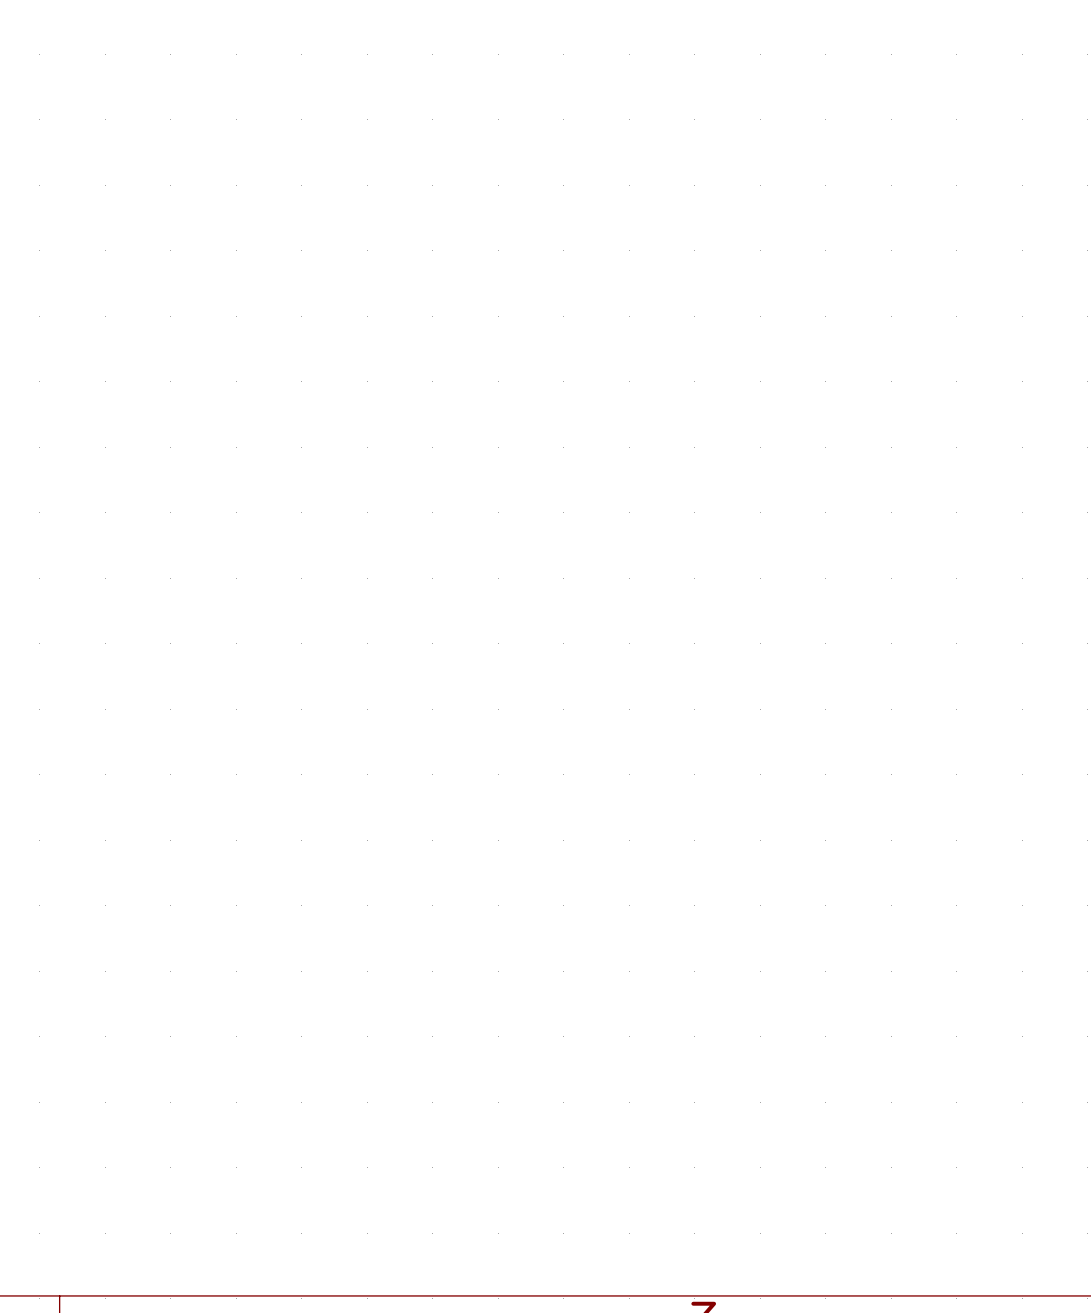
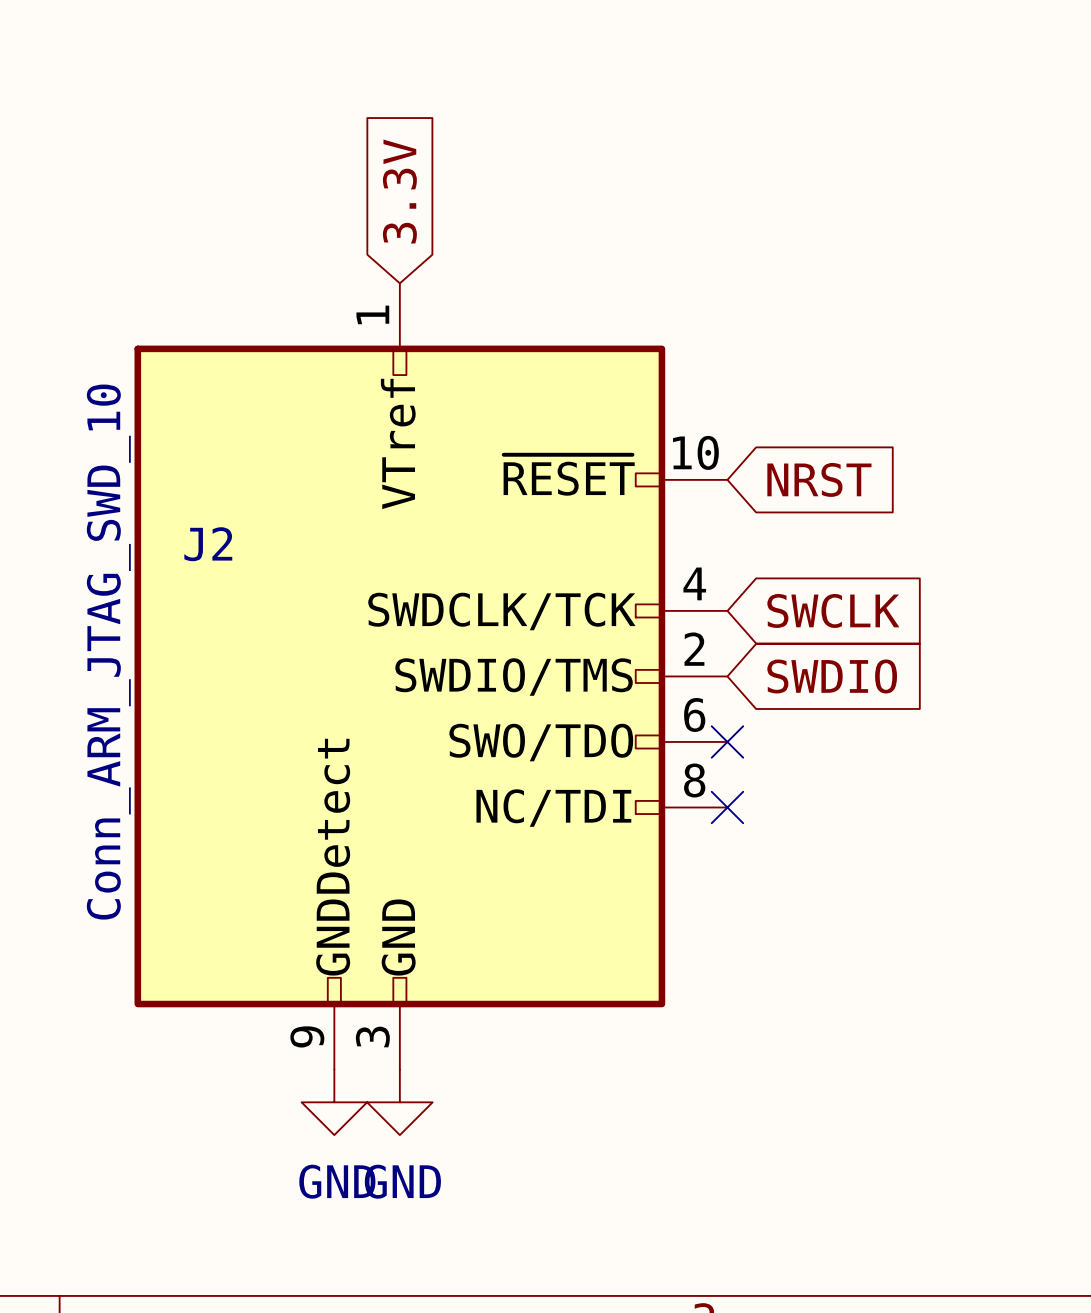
global label: none -> 3.3V (399, 191)
global label: none -> NRST (819, 479)
global label: none -> SWCLK (833, 610)
J2: none -> Conn_ARM_JTAG_SWD_10 (430, 676)
global label: none -> SWDIO (832, 676)
no-connect mark: none -> (727, 741)
no-connect mark: none -> (727, 807)
power symbol: none -> GND (334, 1102)
power symbol: none -> GND (399, 1102)

